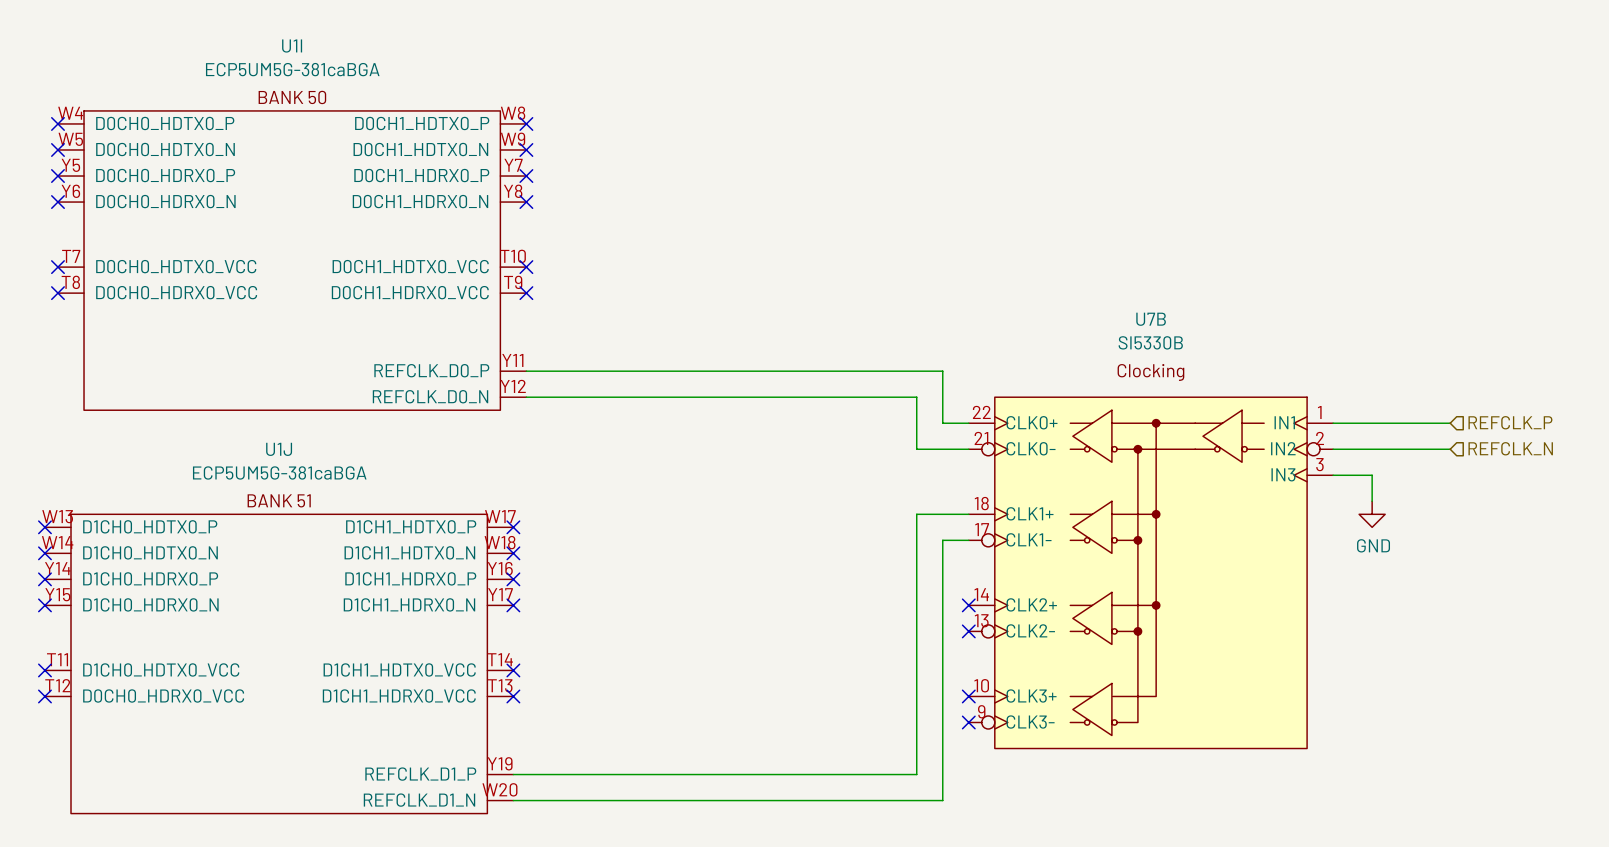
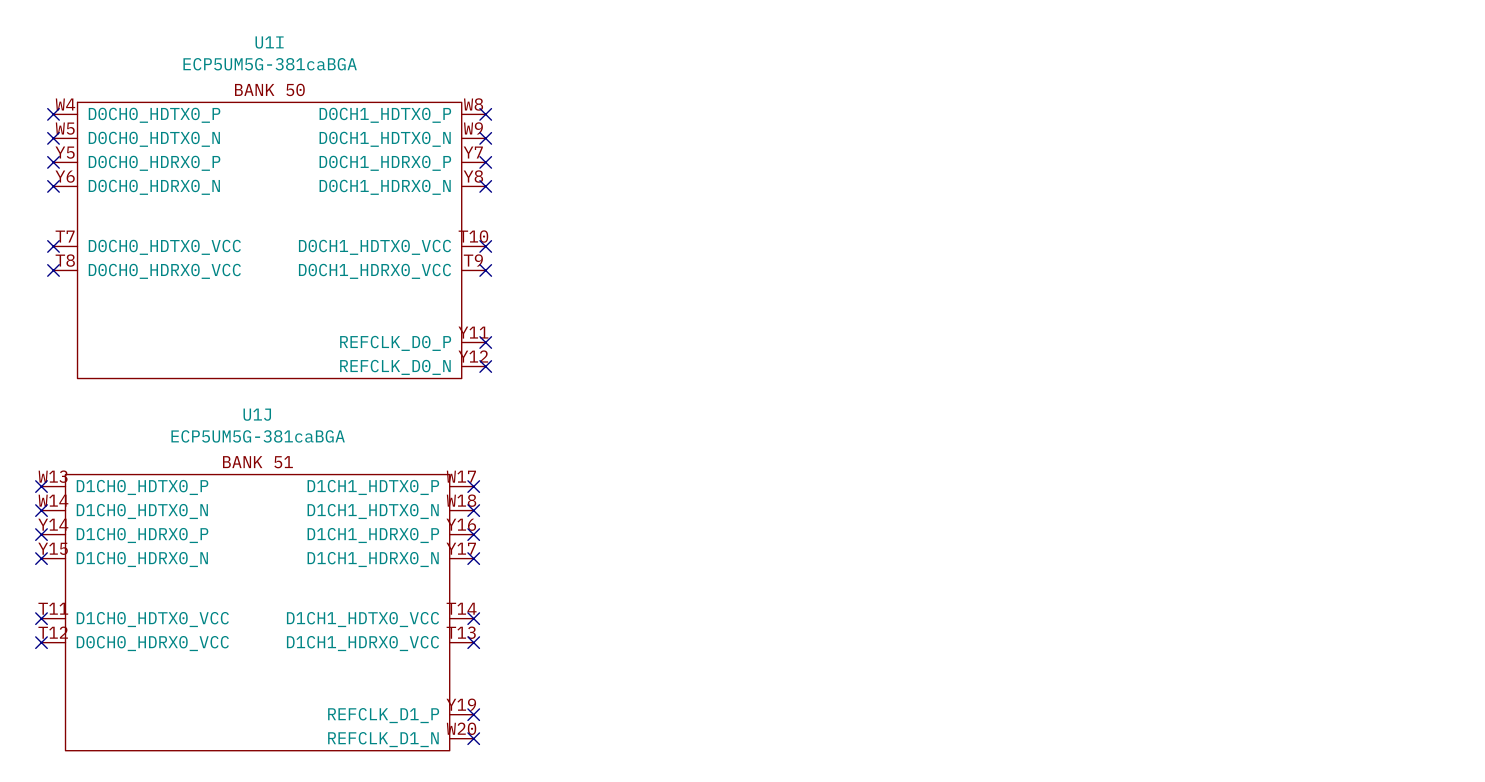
wire: (526, 371) (942, 371) (942, 423) (968, 423) -> none
no-connect mark: none -> (485, 342)
wire: (526, 397) (916, 397) (916, 449) (968, 449) -> none
no-connect mark: none -> (485, 366)
hierarchical label: REFCLK_P (1510, 422) -> none
wire: (1333, 423) (1450, 423) -> none
hierarchical label: REFCLK_N (1510, 448) -> none
wire: (1333, 449) (1450, 449) -> none
wire: (1333, 475) (1372, 475) (1372, 501) -> none
wire: (968, 514) (916, 514) (916, 774) (513, 774) -> none
power symbol: GND (1372, 514) -> none
wire: (968, 540) (942, 540) (942, 800) (513, 800) -> none
U7B: SI5330B (1150, 572) -> none
no-connect mark: (968, 605) -> none
no-connect mark: (968, 631) -> none
no-connect mark: (968, 696) -> none
no-connect mark: (968, 722) -> none
no-connect mark: none -> (473, 714)
no-connect mark: none -> (473, 738)

